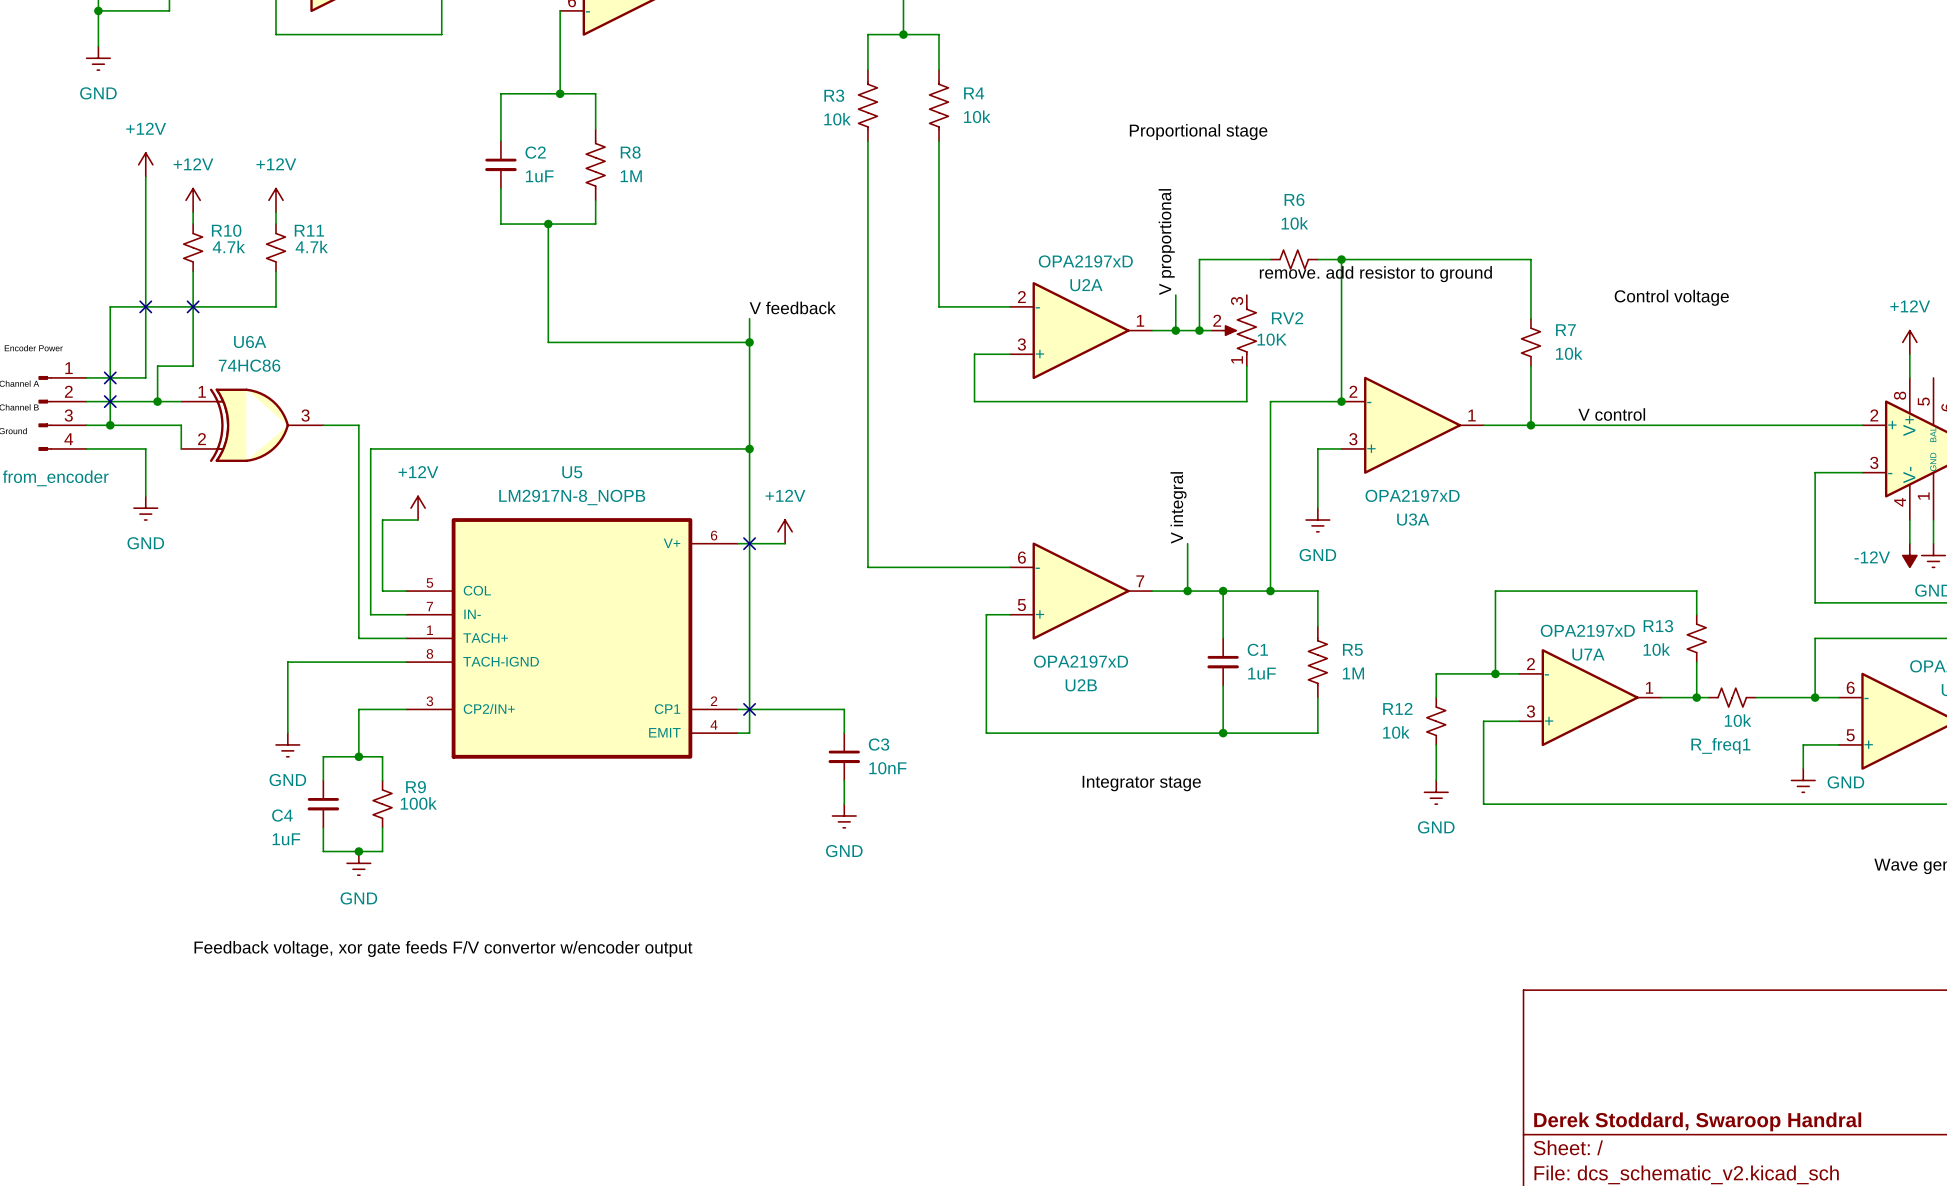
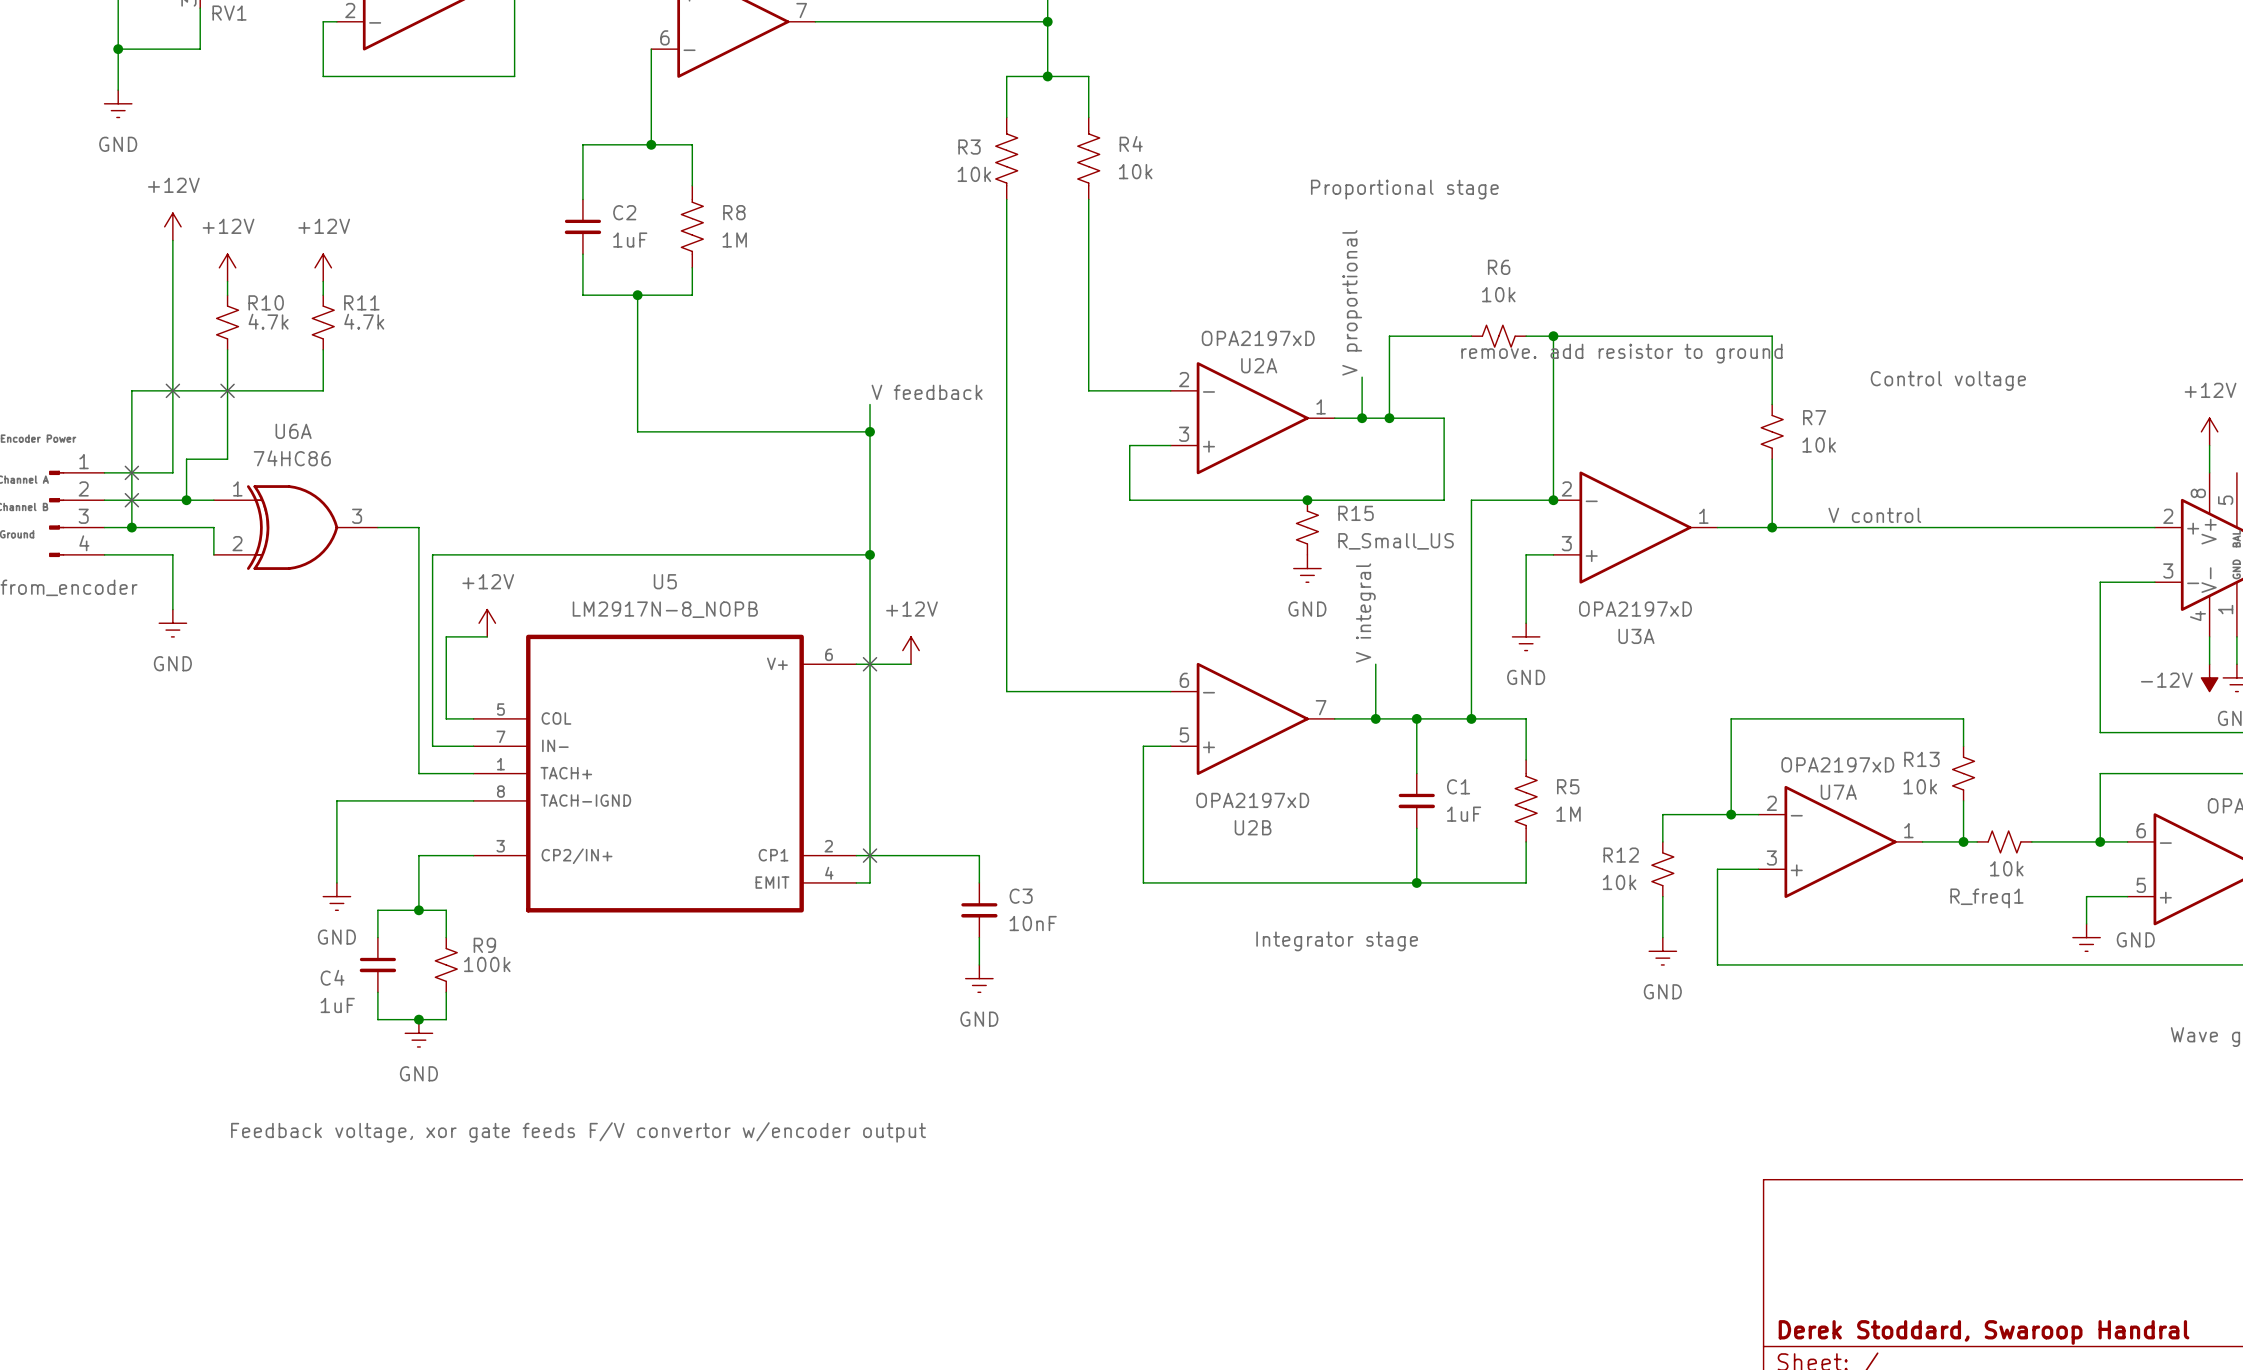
RV2: 10K (1233, 330) -> none
junction: none -> (1307, 500)
R15: none -> R_Small_US (1307, 527)
power symbol: none -> GND (1307, 568)

